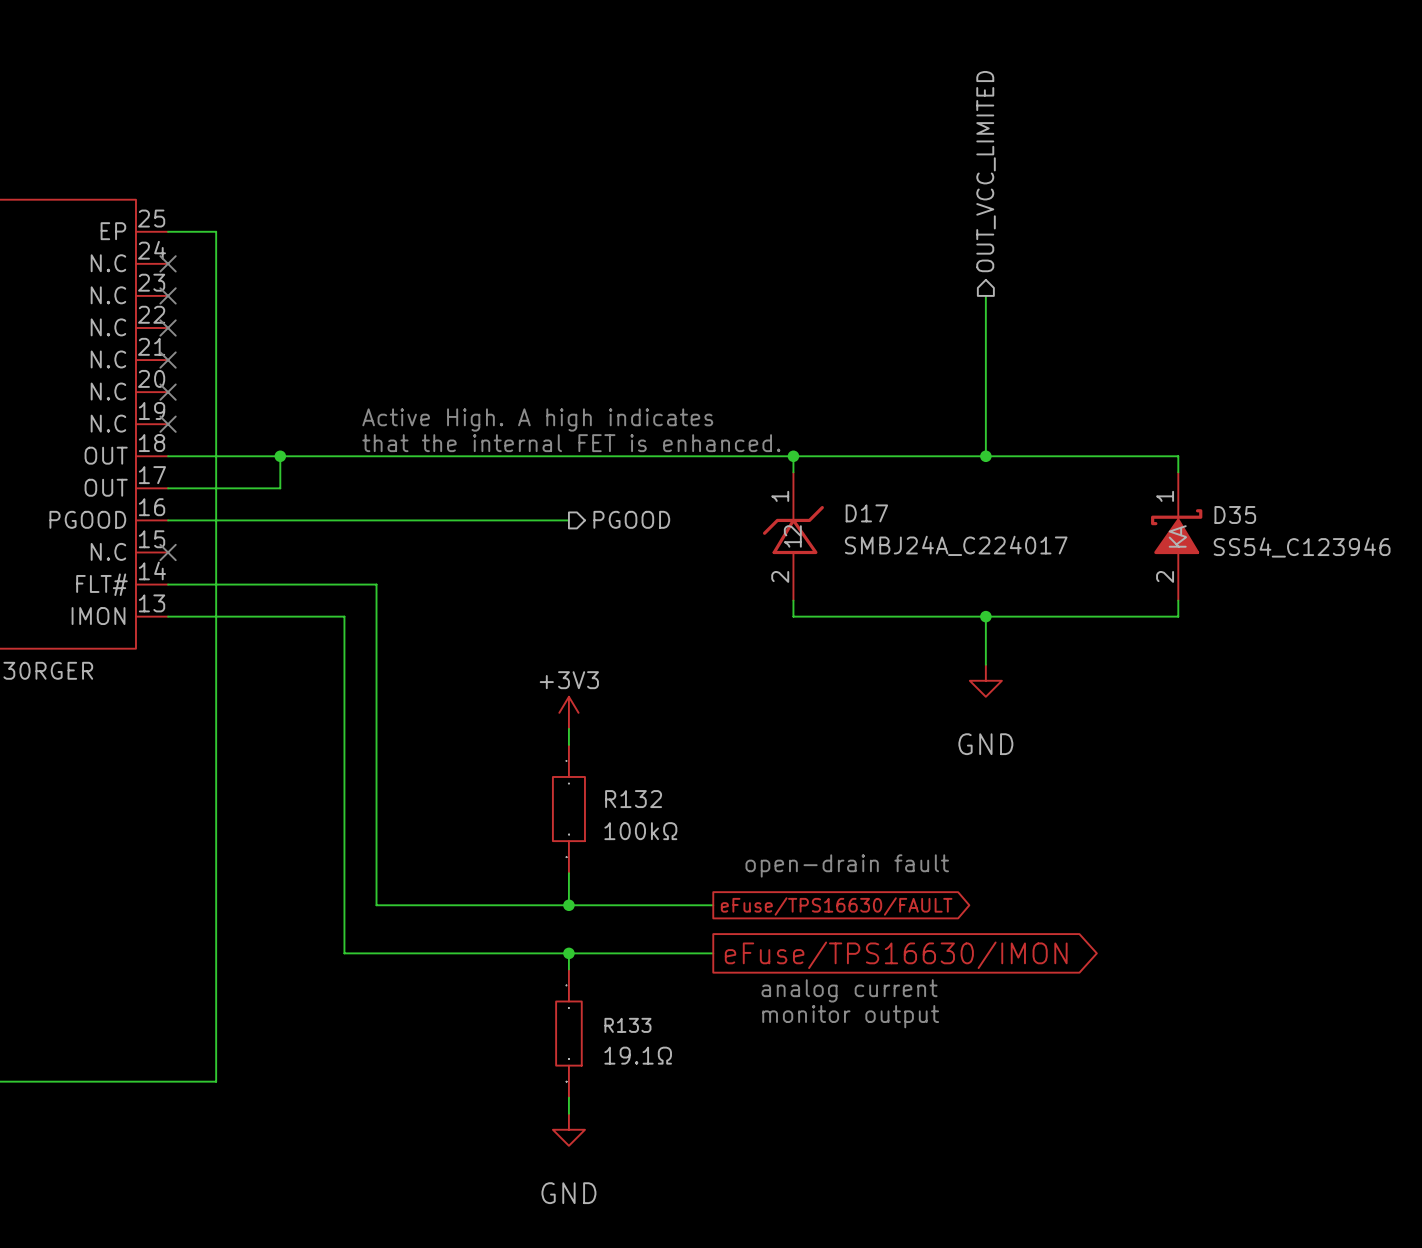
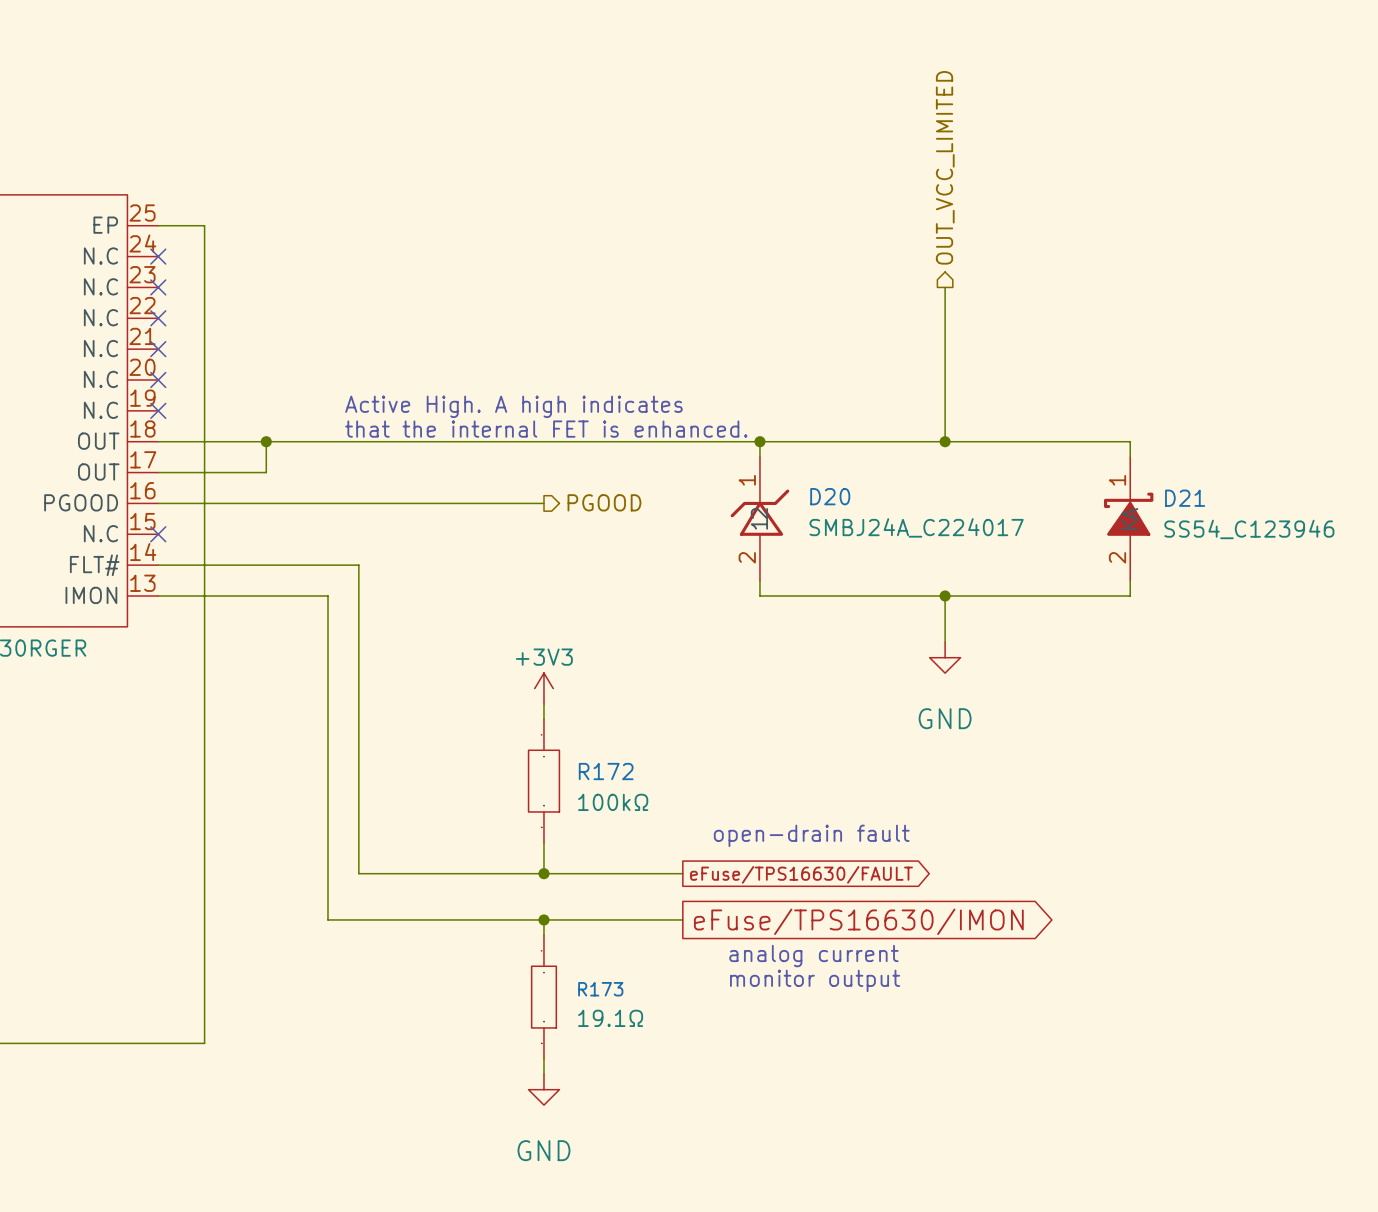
D17 name: D17 (866, 513) -> D20 (830, 496)
D35 name: D35 (1235, 515) -> D21 (1185, 498)
R132 name: R132 (633, 799) -> R172 (606, 771)
R133 name: R133 (627, 1025) -> R173 (600, 989)

